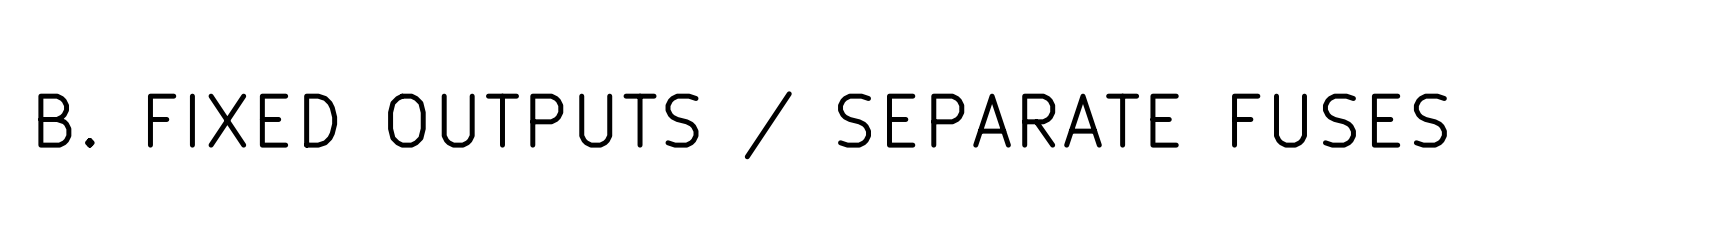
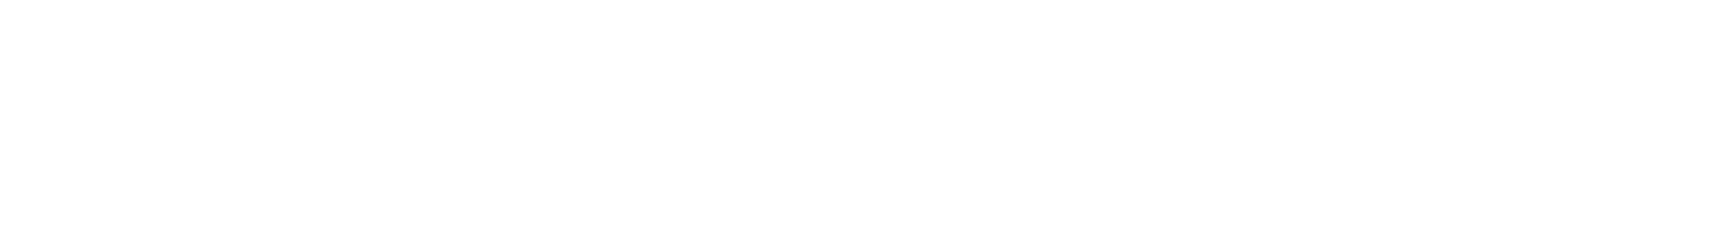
text: B. FIXED OUTPUTS / SEPARATE FUSES (742, 125) -> none

